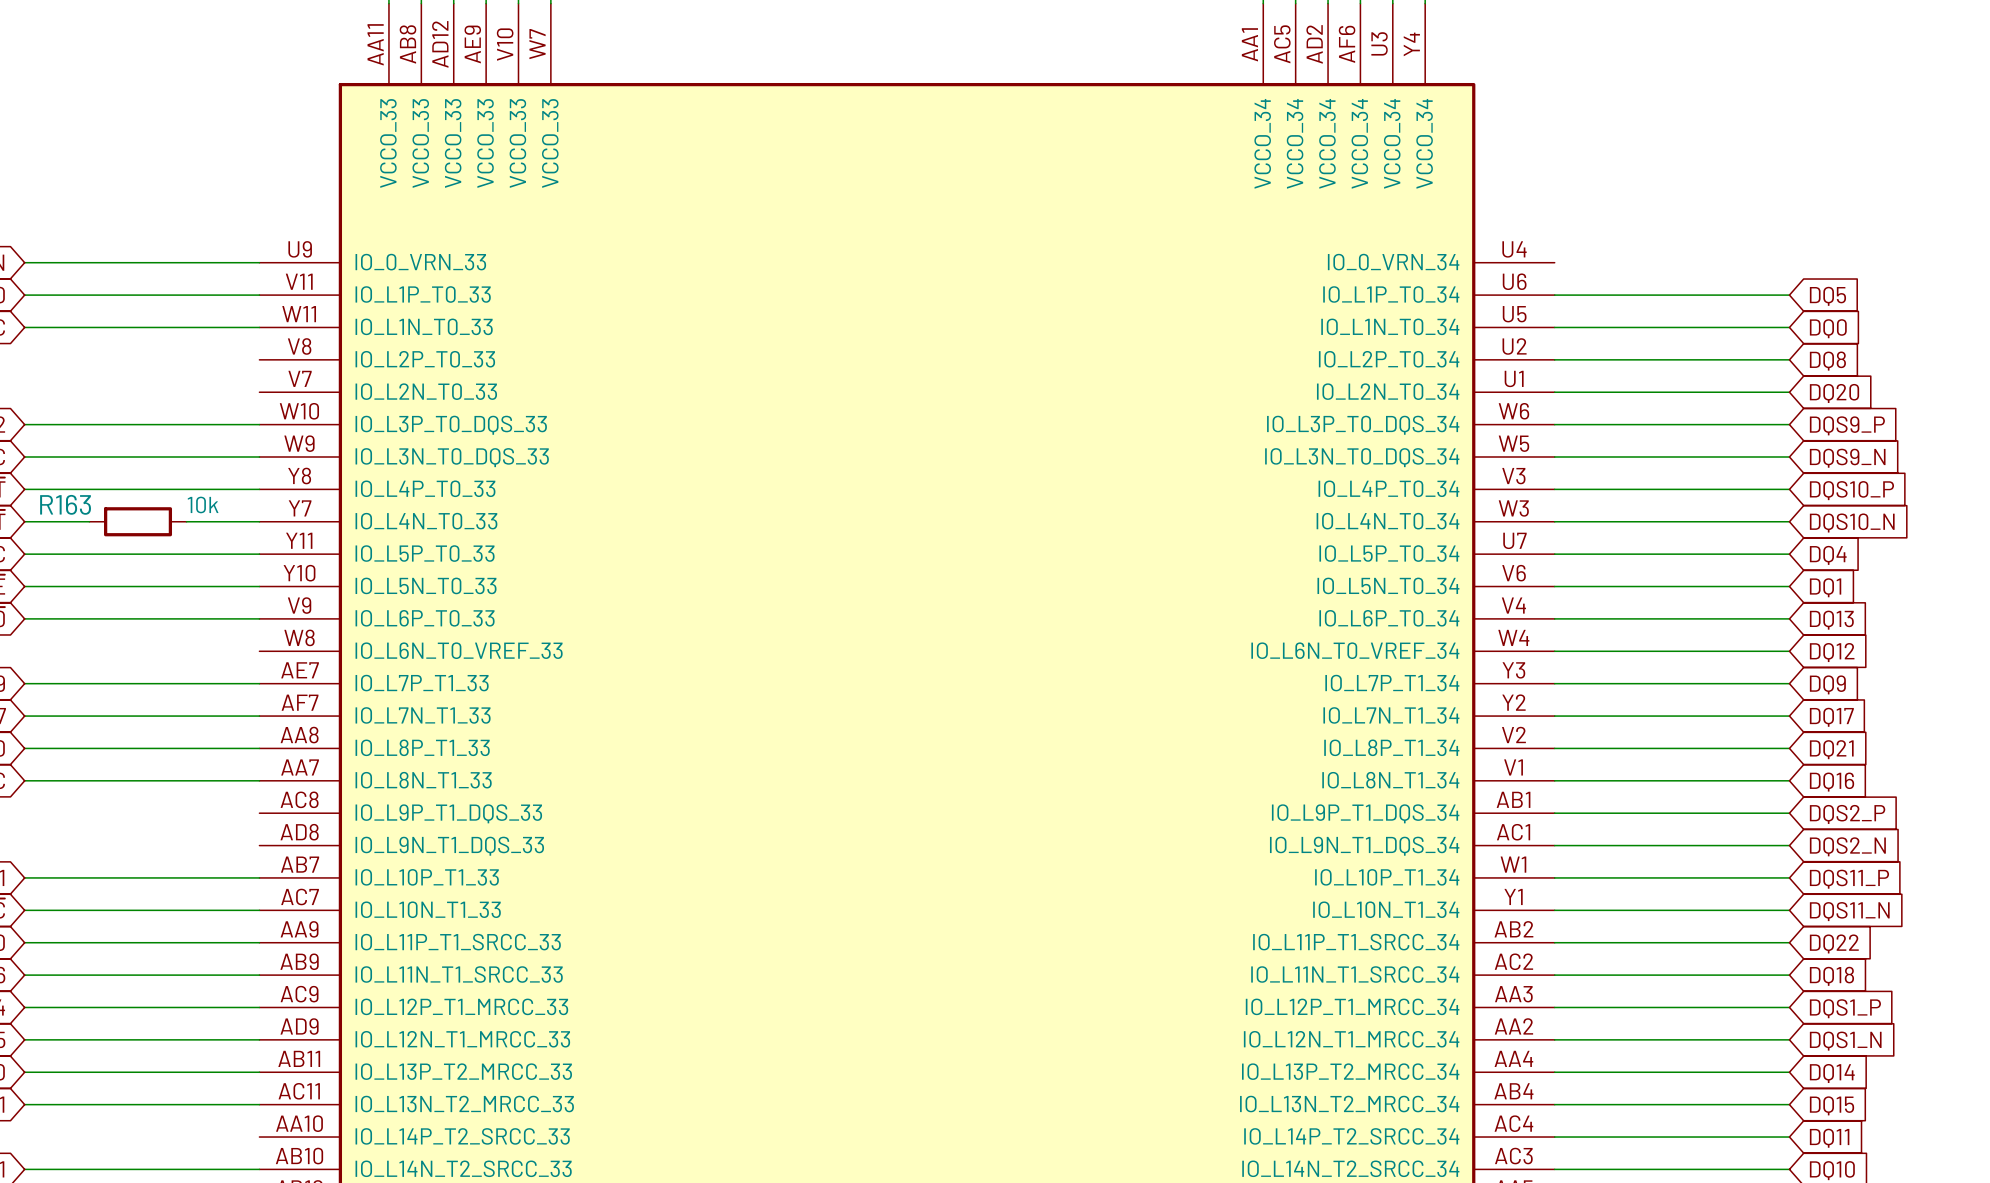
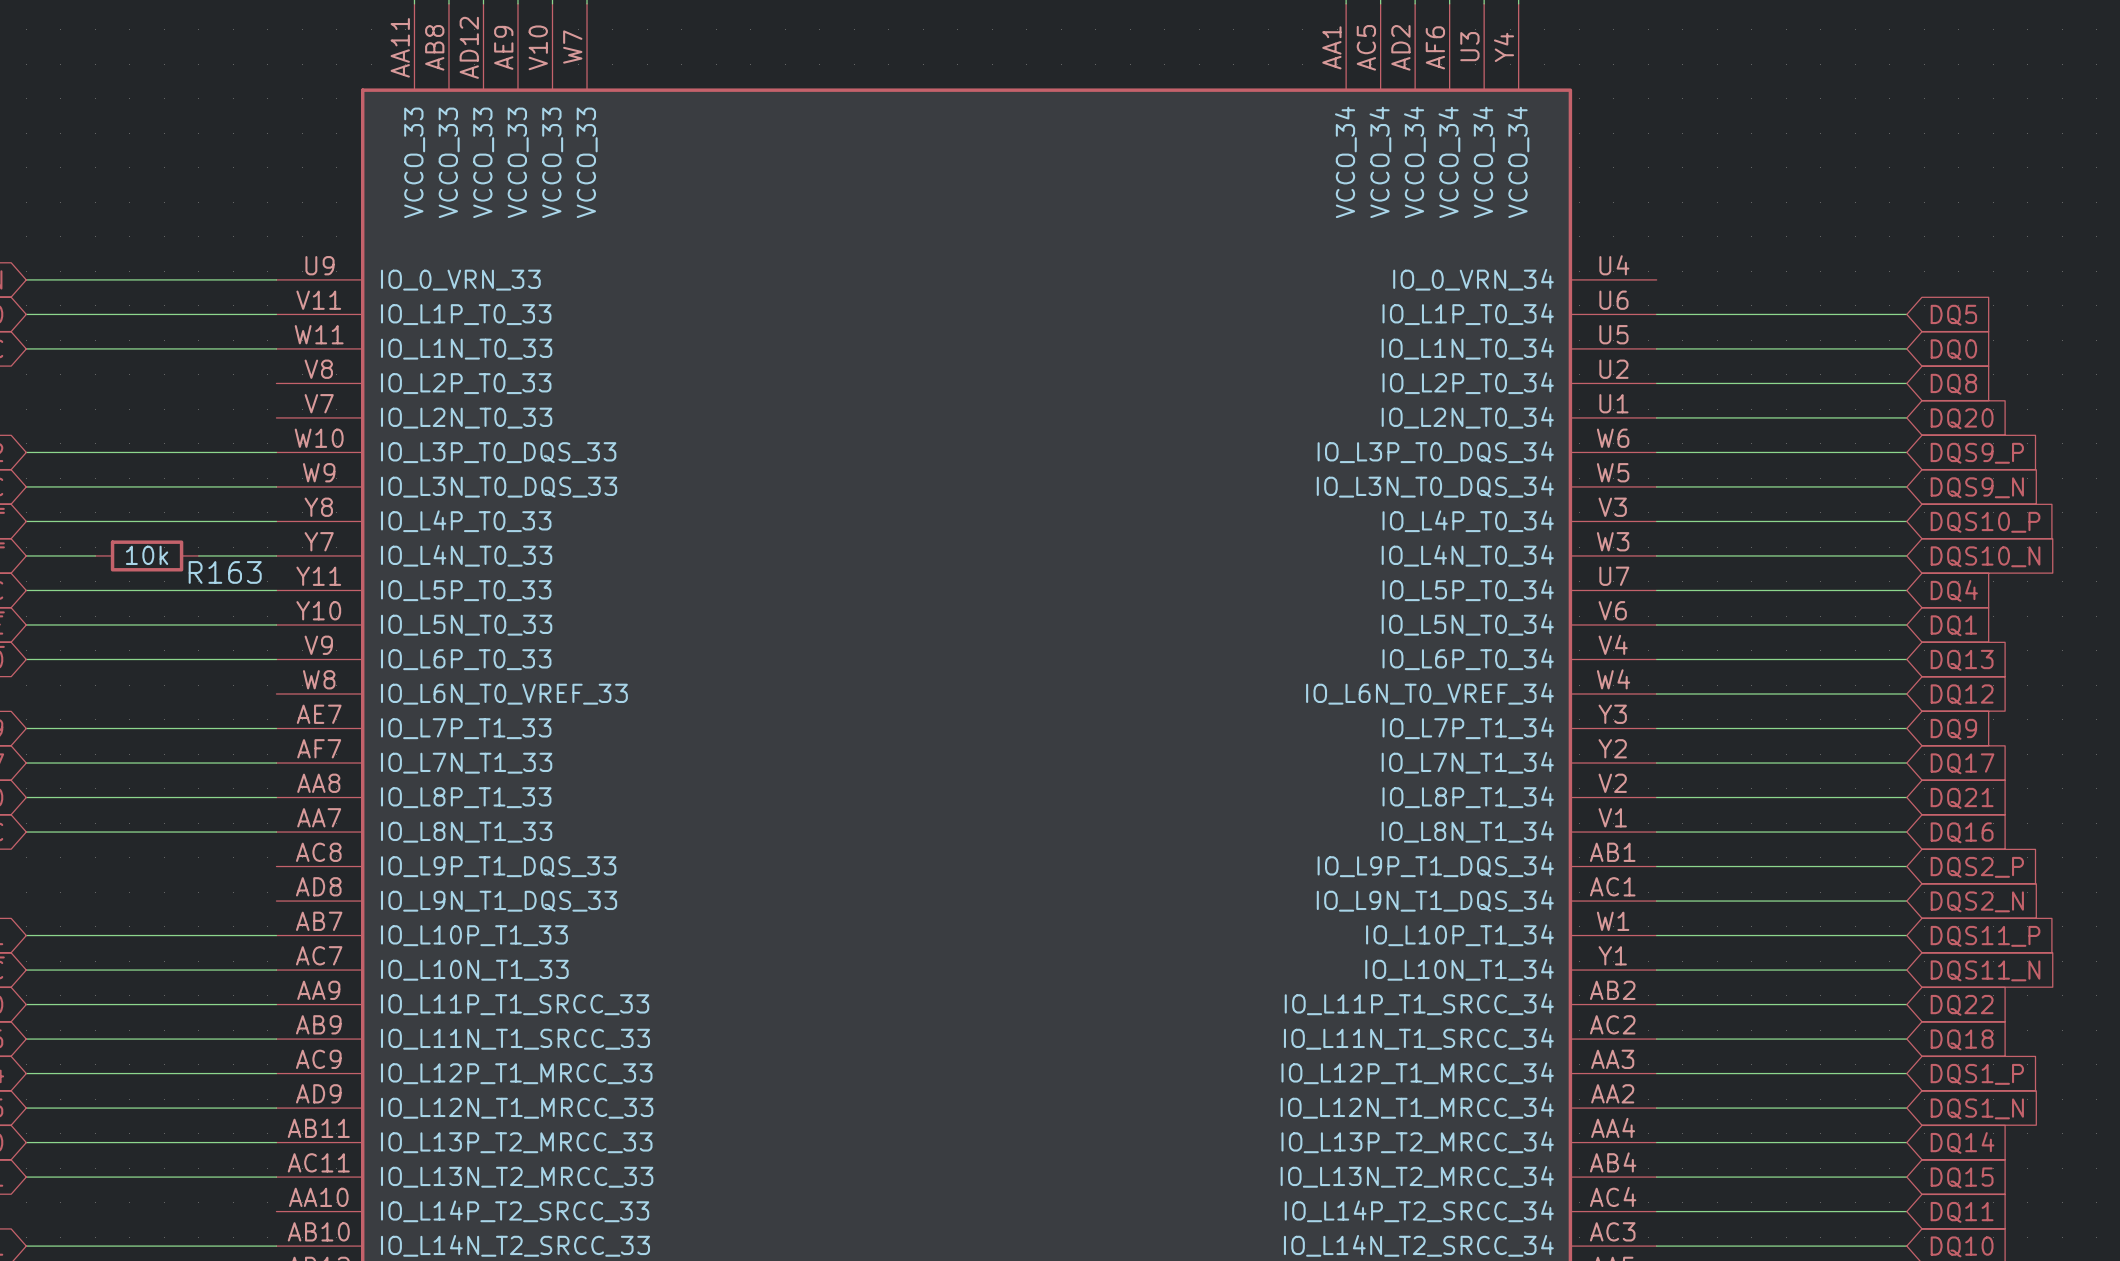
R163 name position: R163 (65, 504) -> R163 (225, 572)
R163 text position: 10k (203, 504) -> 10k (147, 555)

